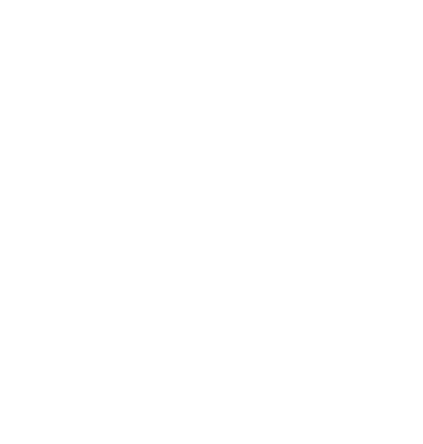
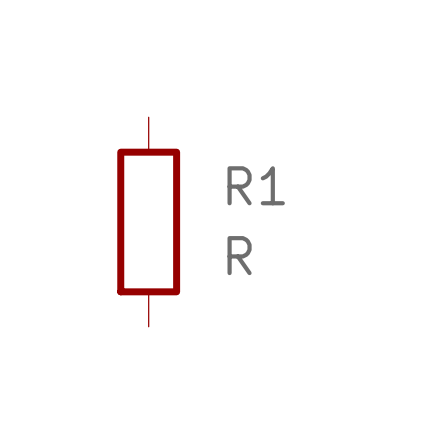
R1: none -> R (148, 222)

